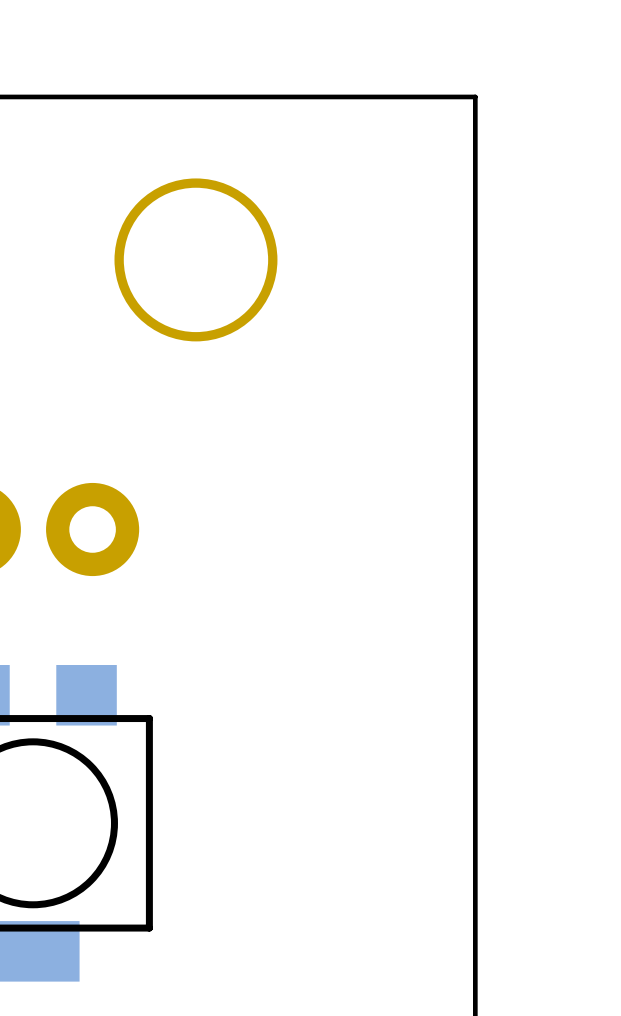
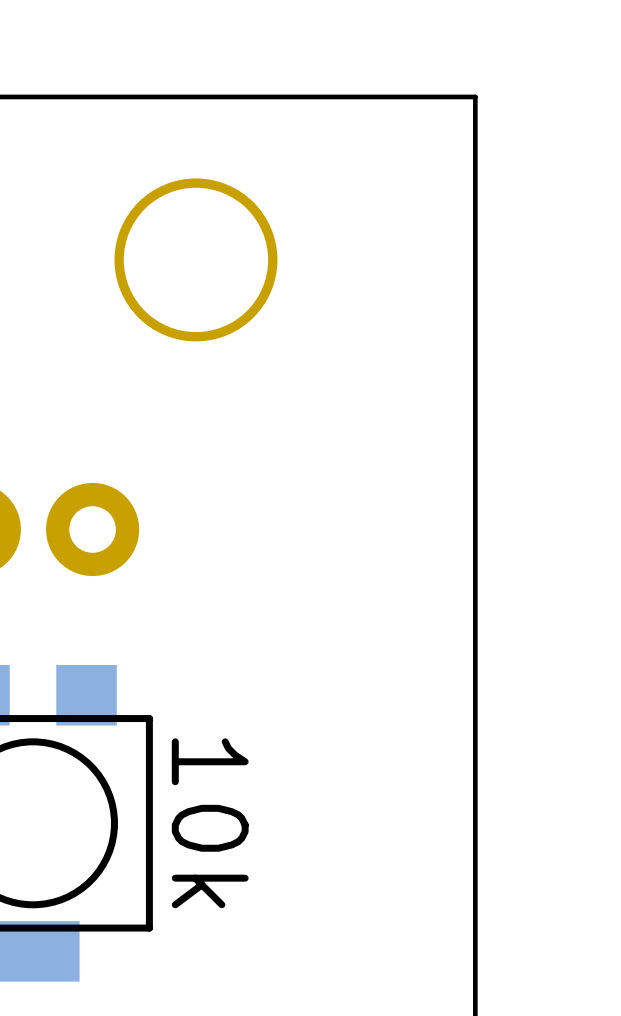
part value: none -> 10k (210, 823)

